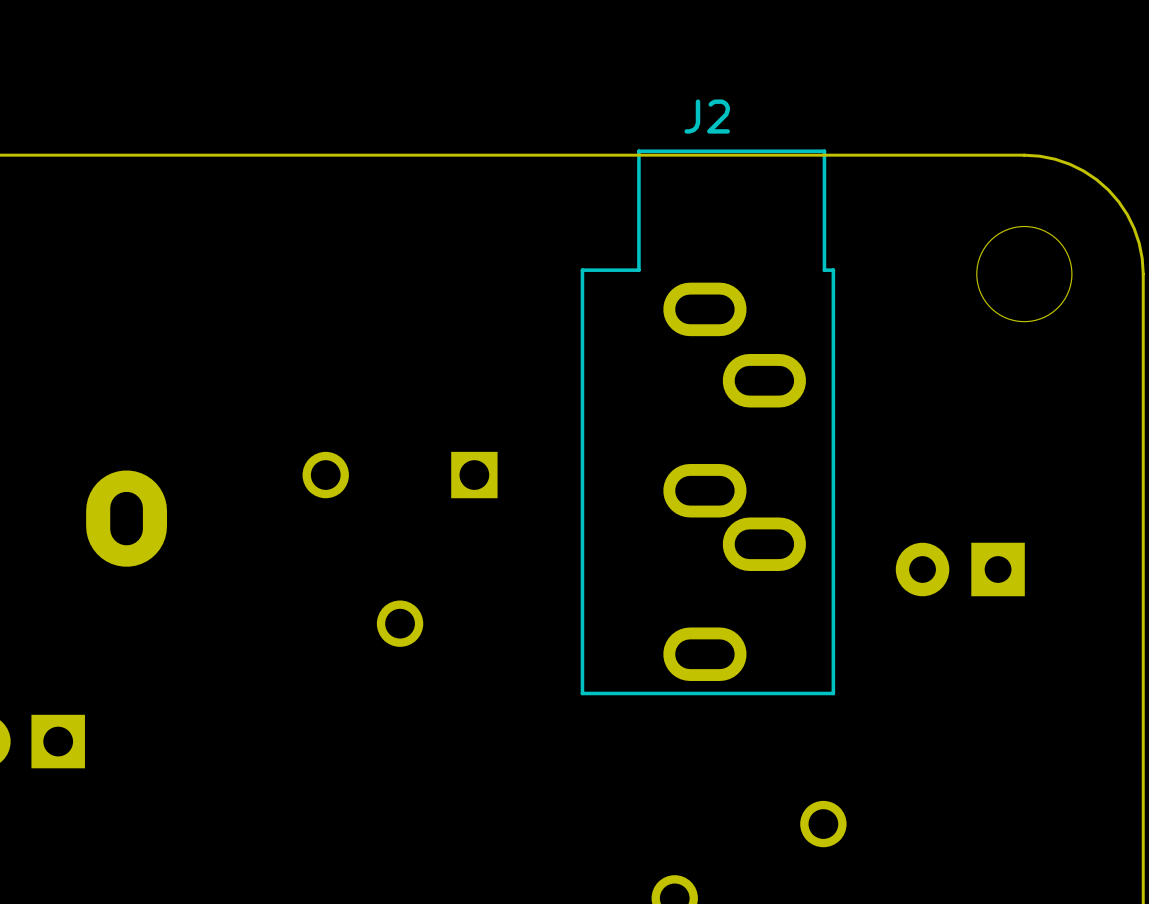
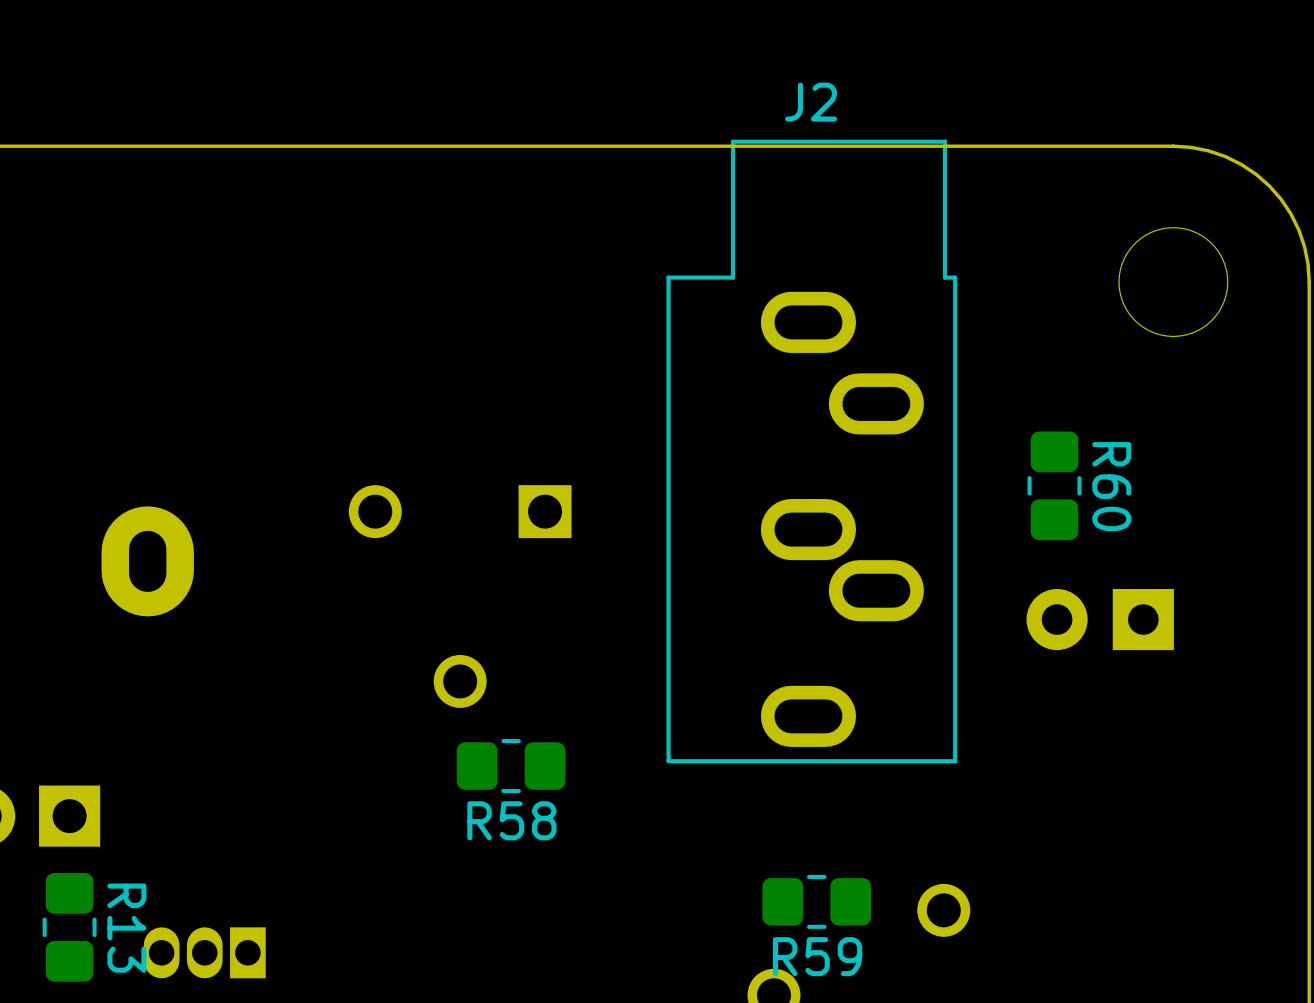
R60: none -> (1054, 485)
R58: none -> (511, 766)
R59: none -> (816, 901)
R13: none -> (69, 927)
part: none -> (204, 952)

